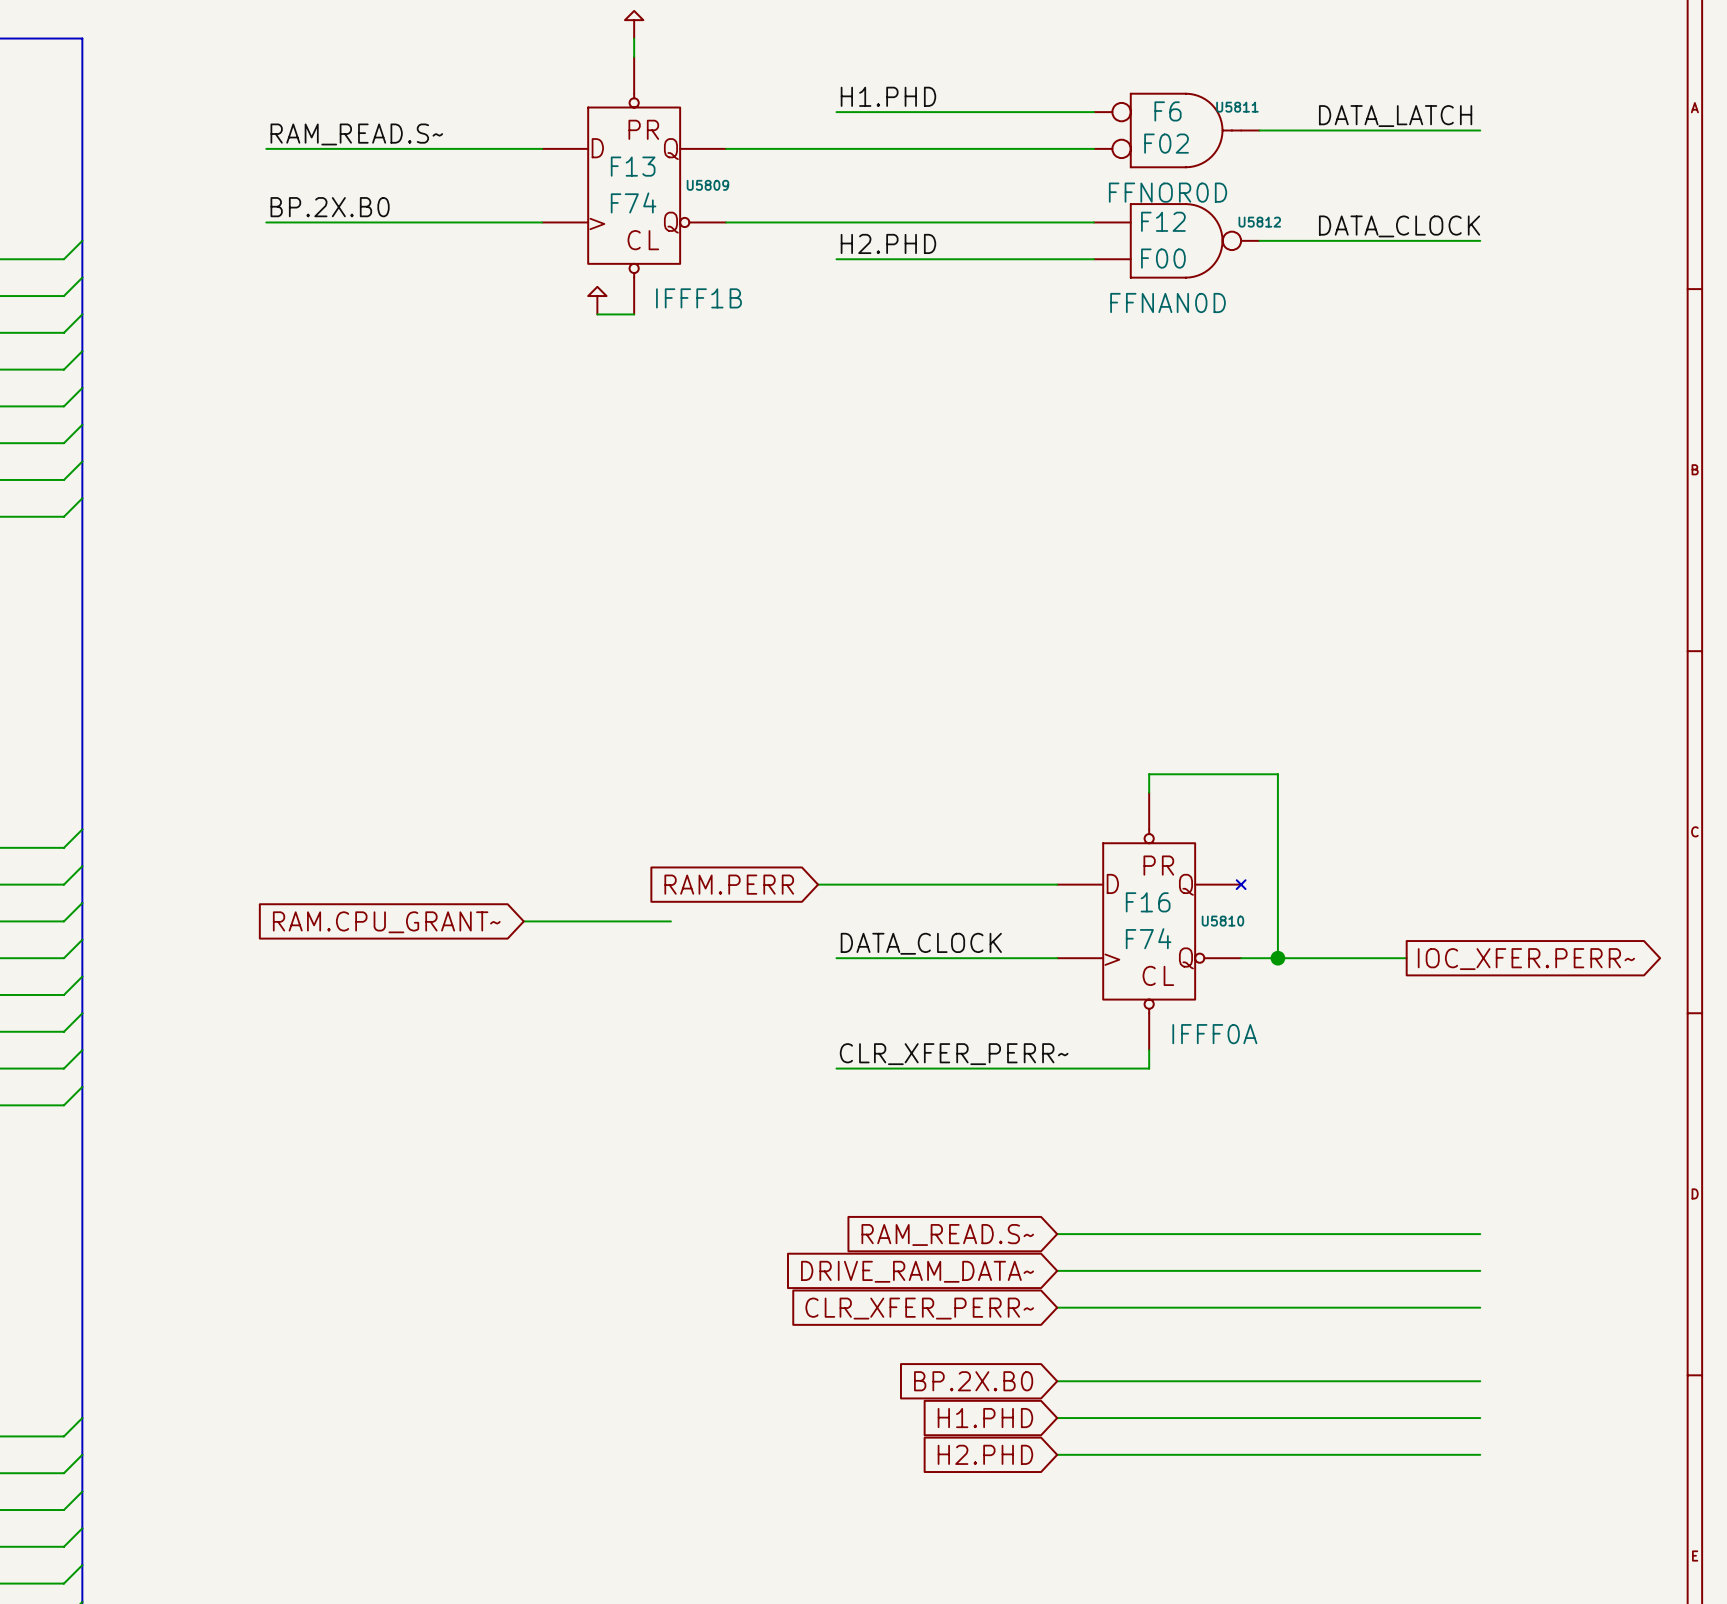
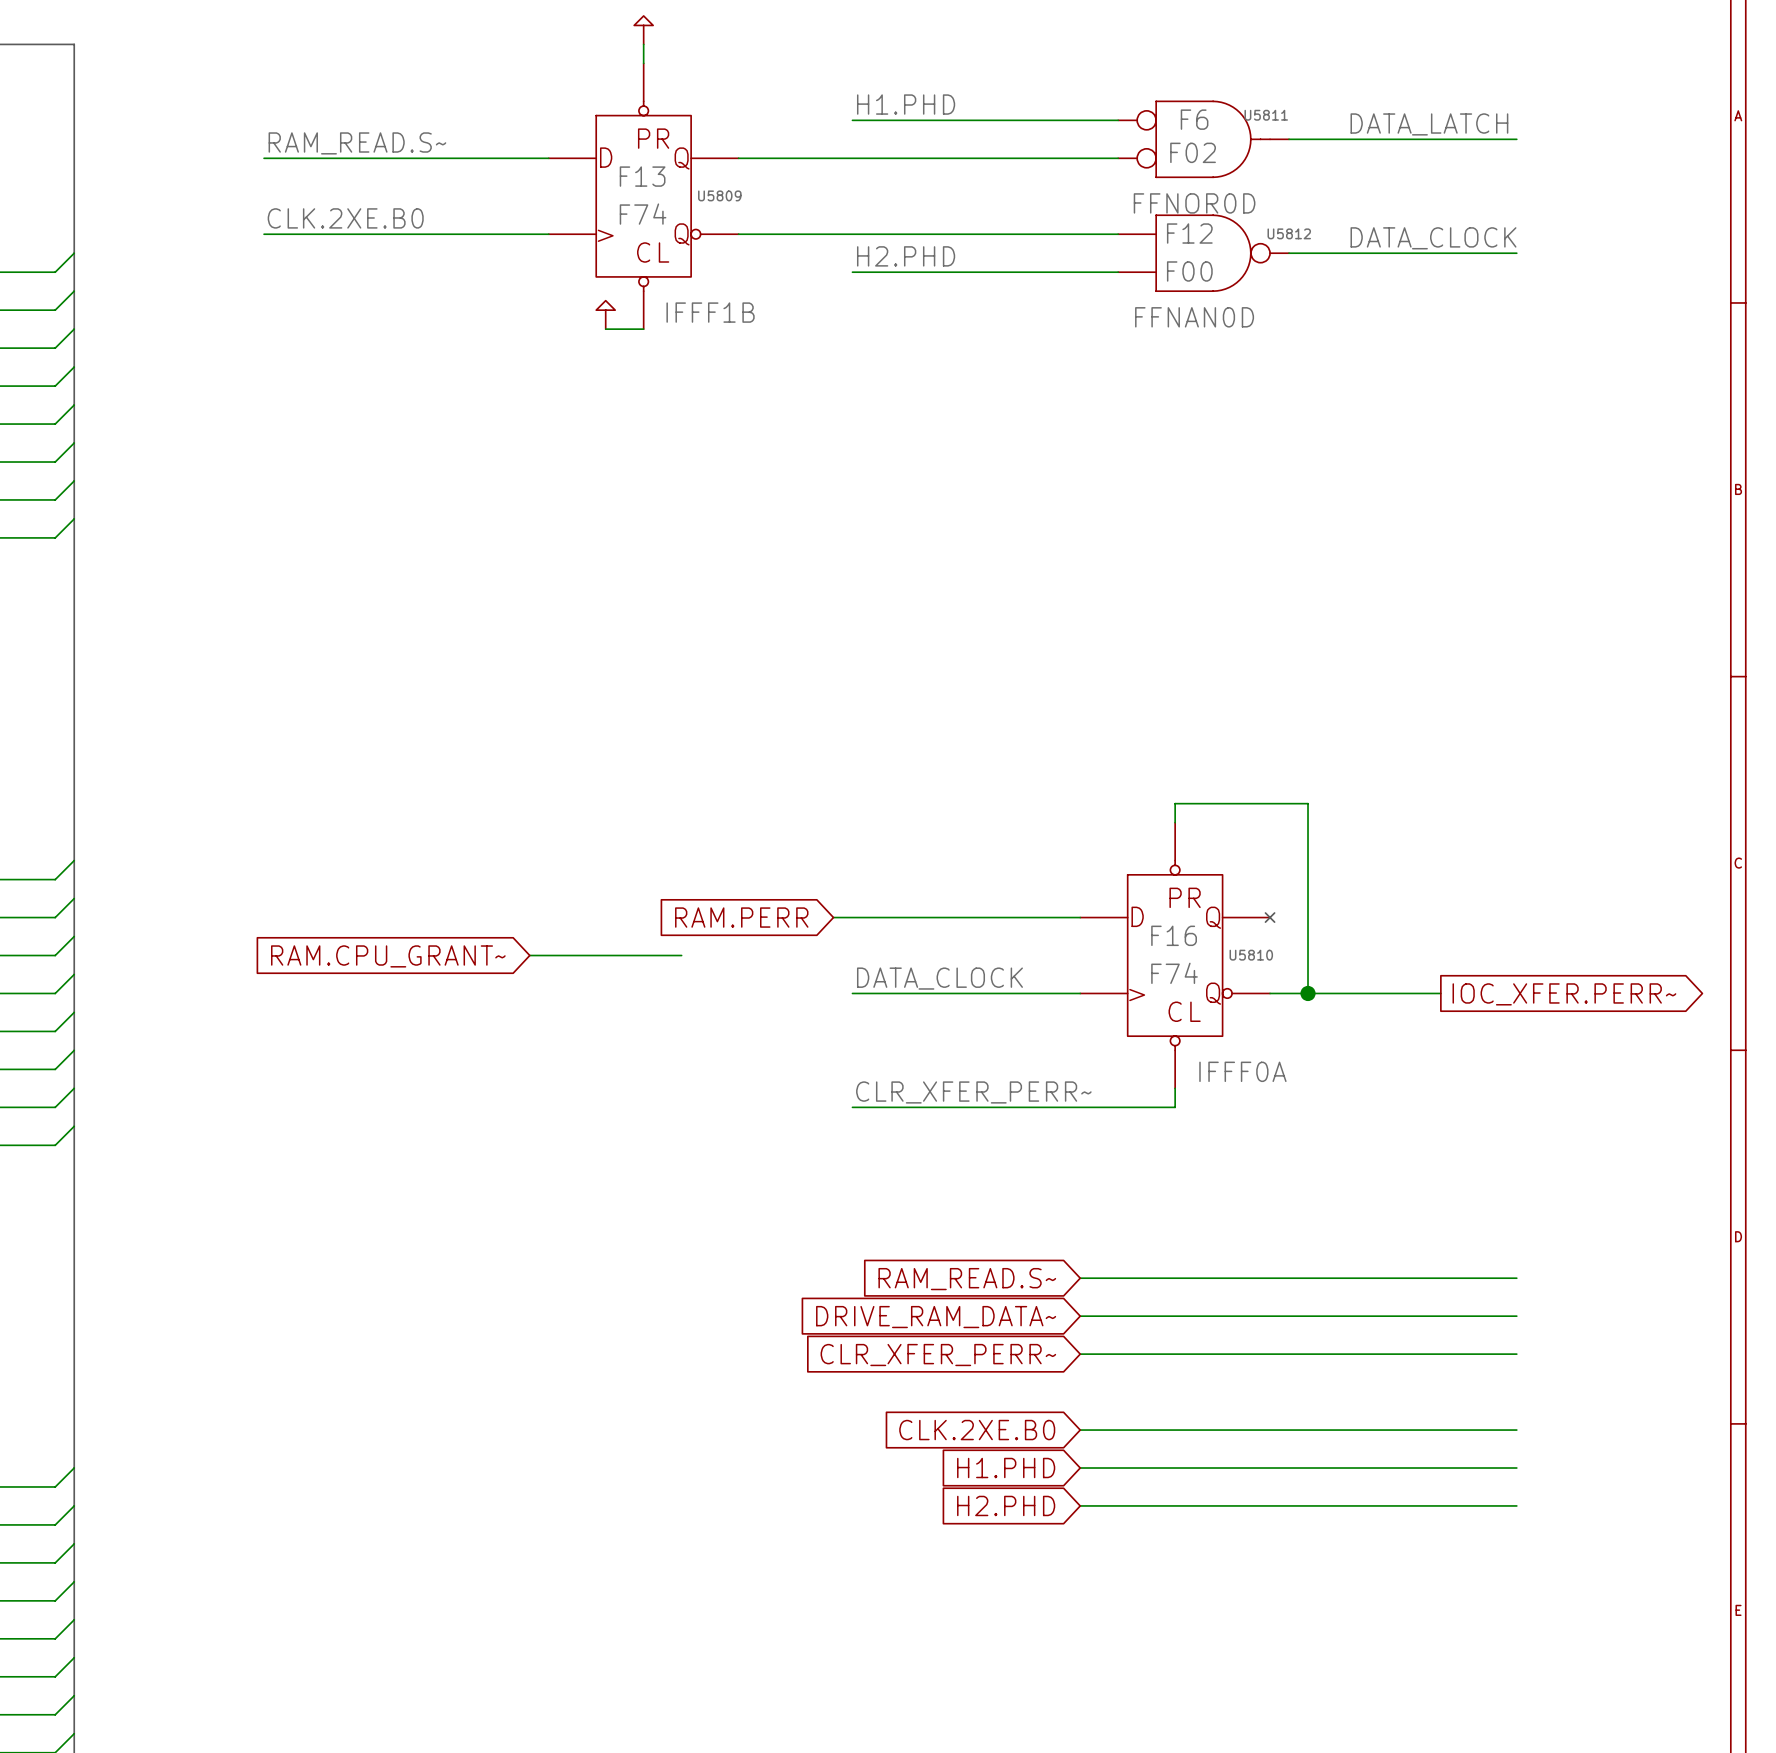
label: BP.2X.B0 (330, 207) -> CLK.2XE.B0 (345, 218)
global label: BP.2X.B0 (973, 1381) -> CLK.2XE.B0 (977, 1430)

